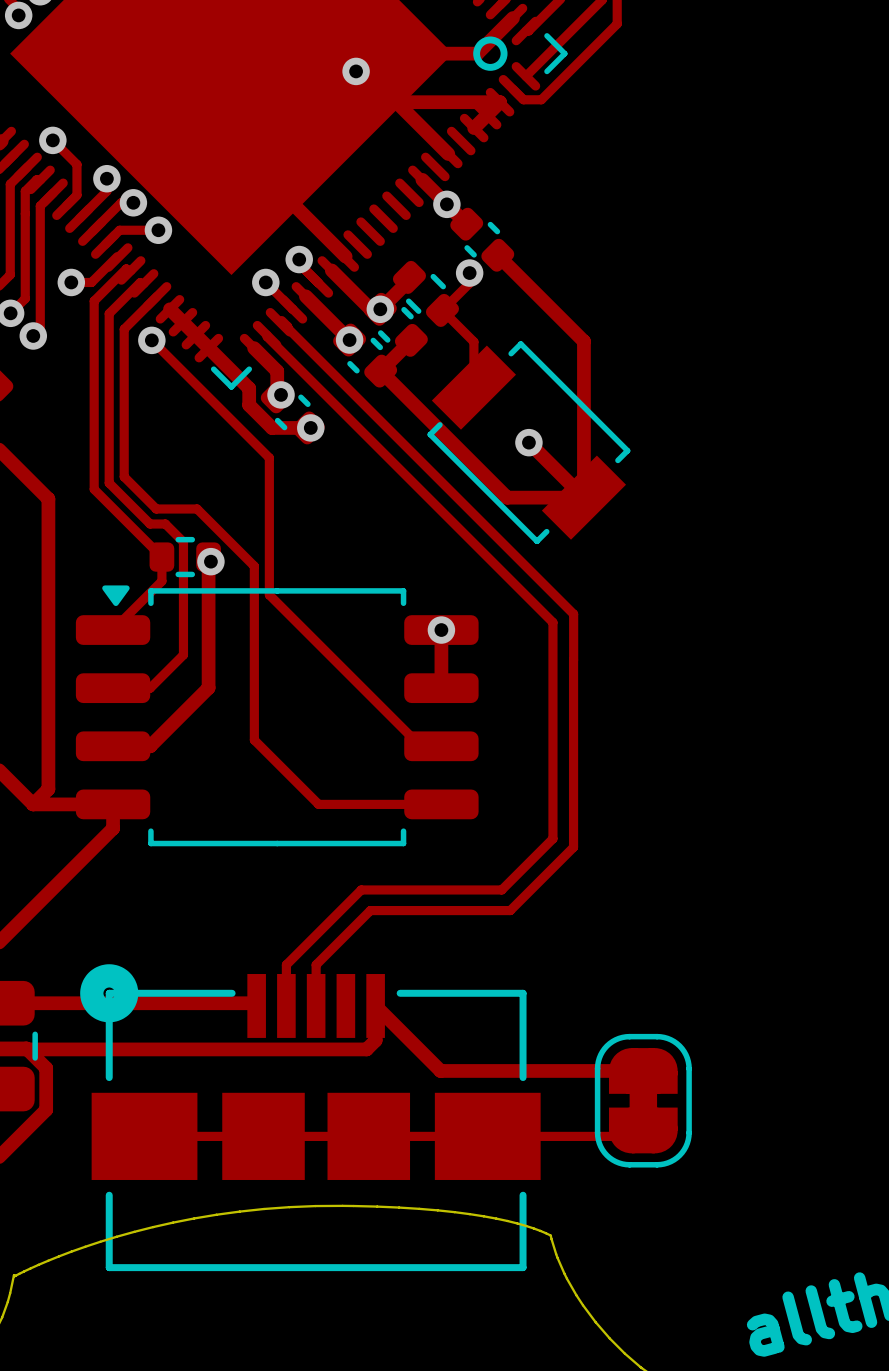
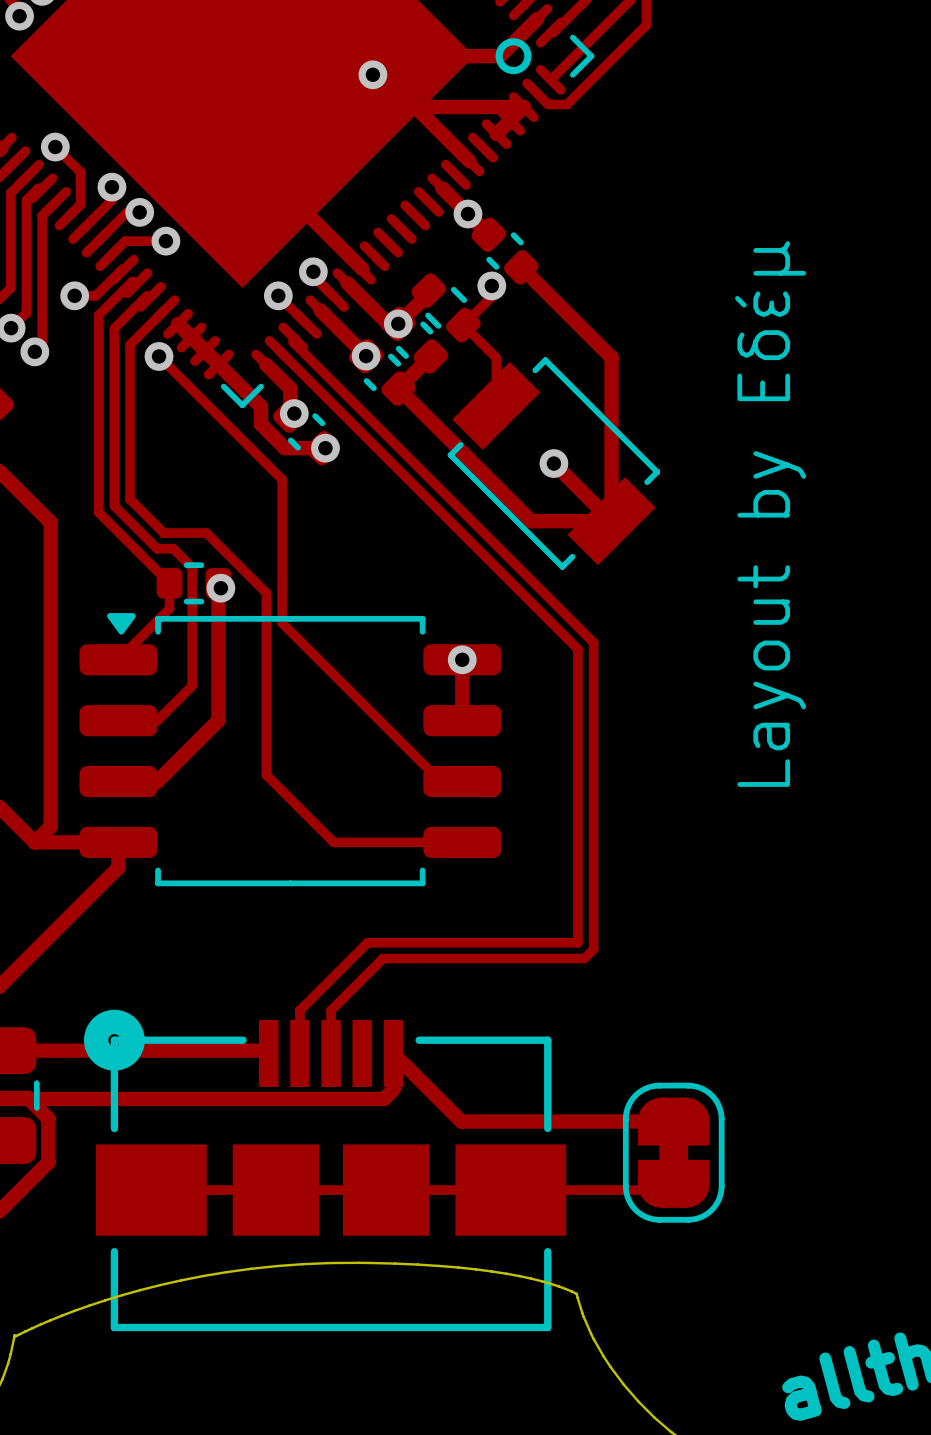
track: (281, 320) (573, 614) (573, 660) -> none
track: (267, 335) (552, 622) (552, 838) (501, 889) (361, 889) (350, 900) -> (279, 351) (577, 649) (577, 942) (367, 942)
text: none -> Layout by Εδέμ (770, 514)
track: (573, 660) (573, 847) (510, 910) (370, 910) (365, 915) -> (293, 337) (293, 342) (593, 642) (593, 949) (584, 958) (382, 958)

